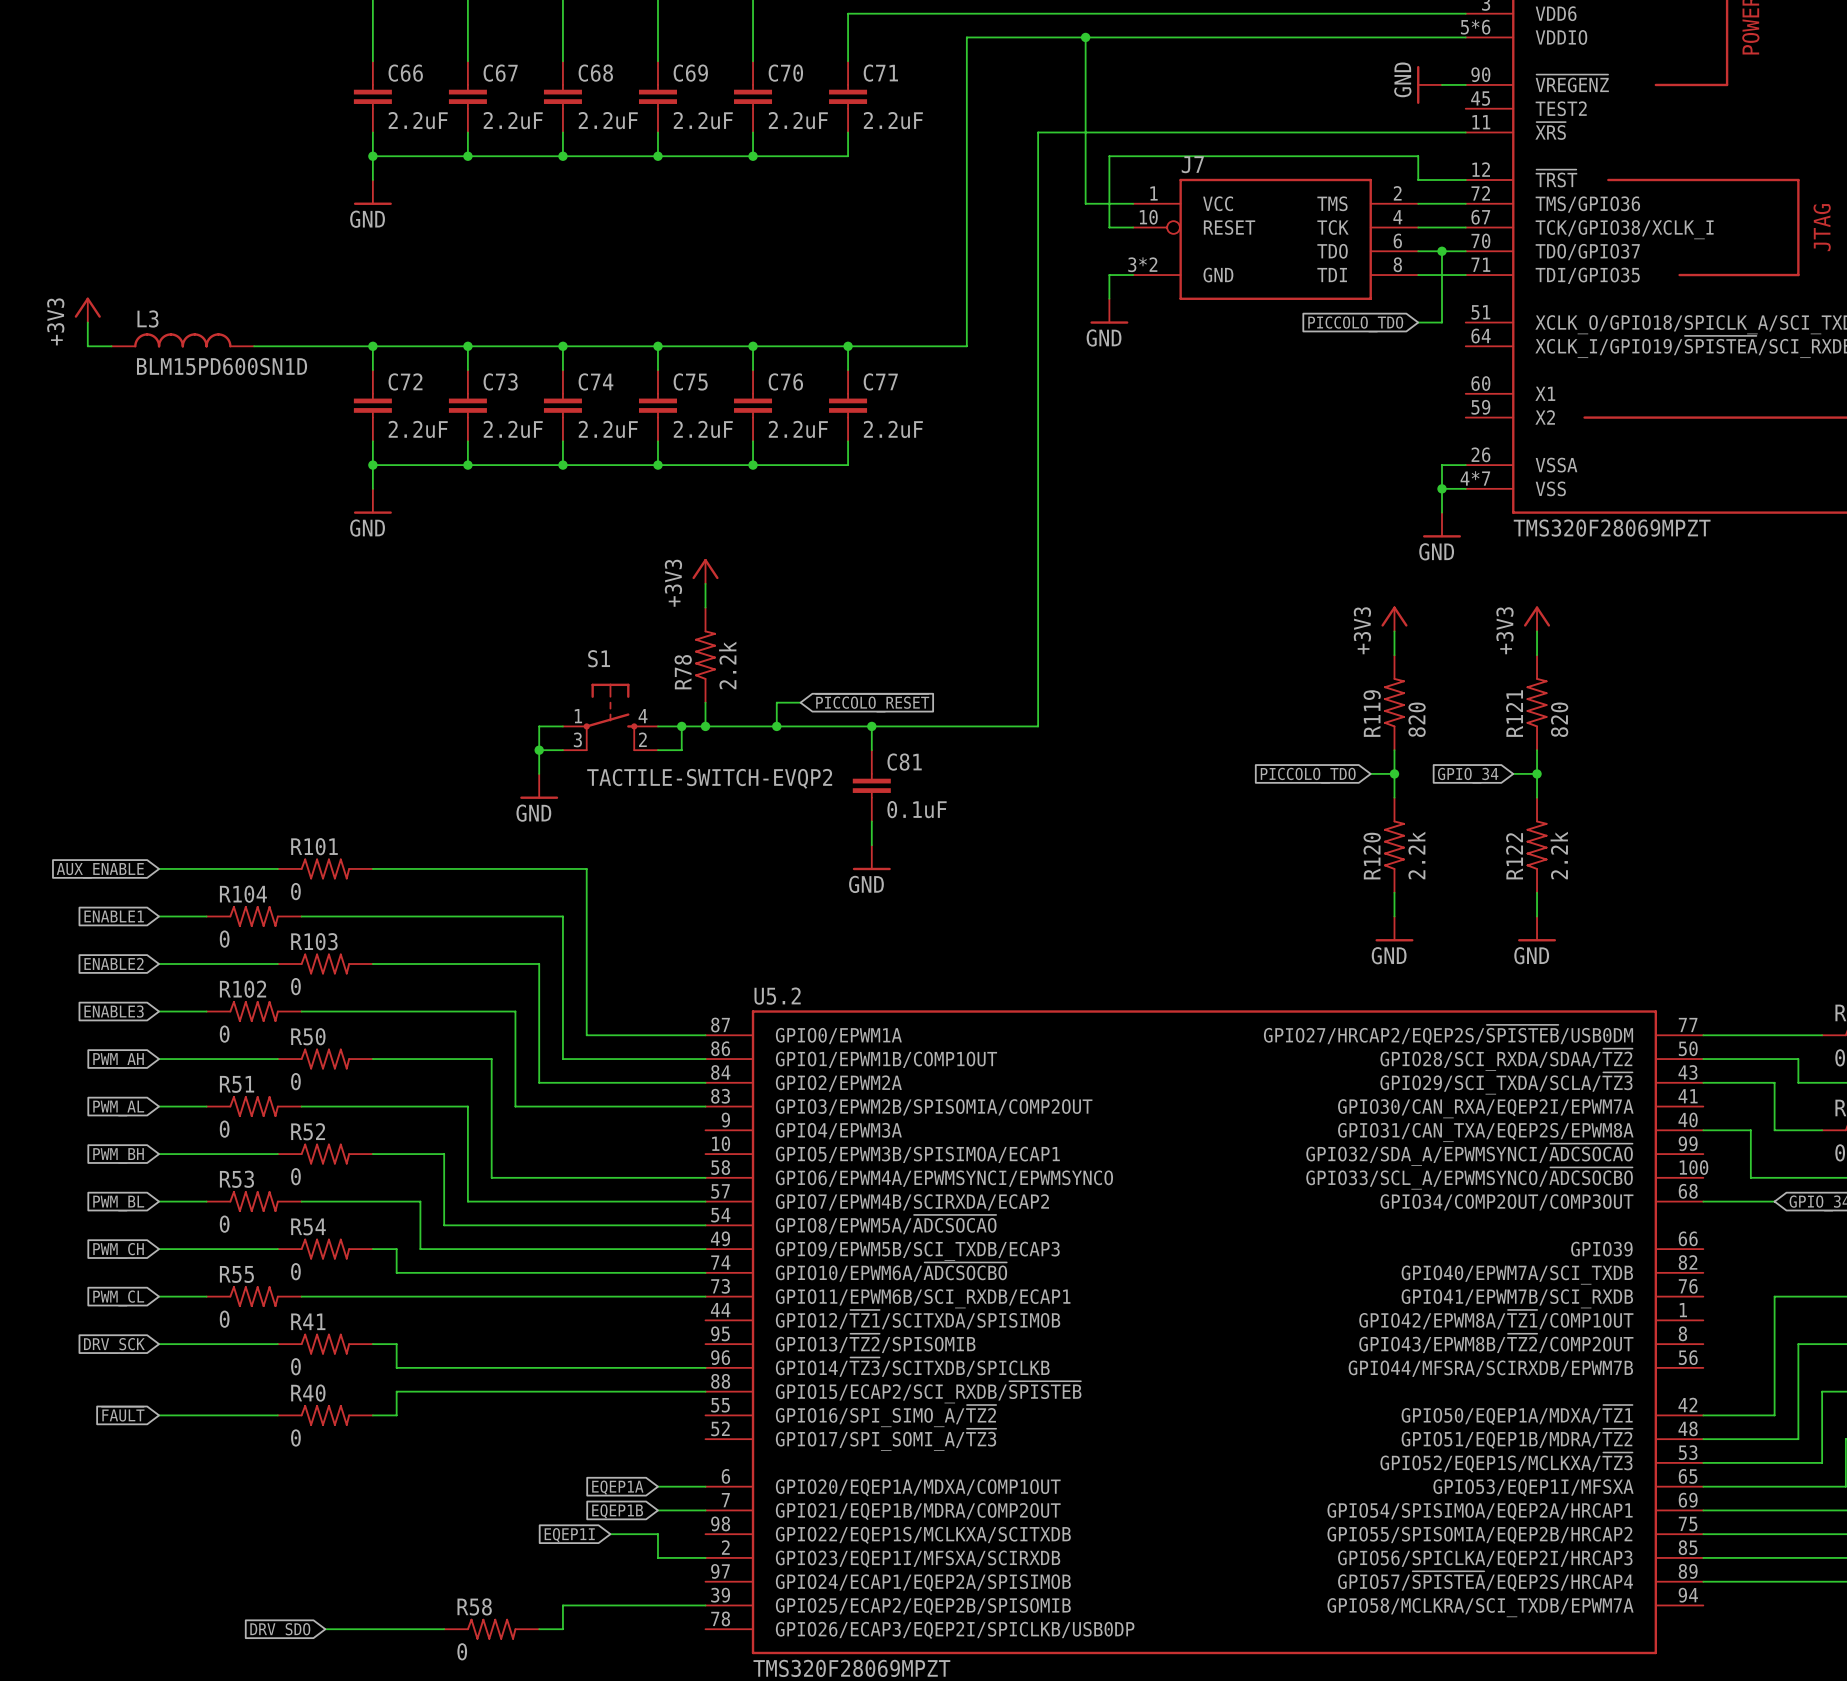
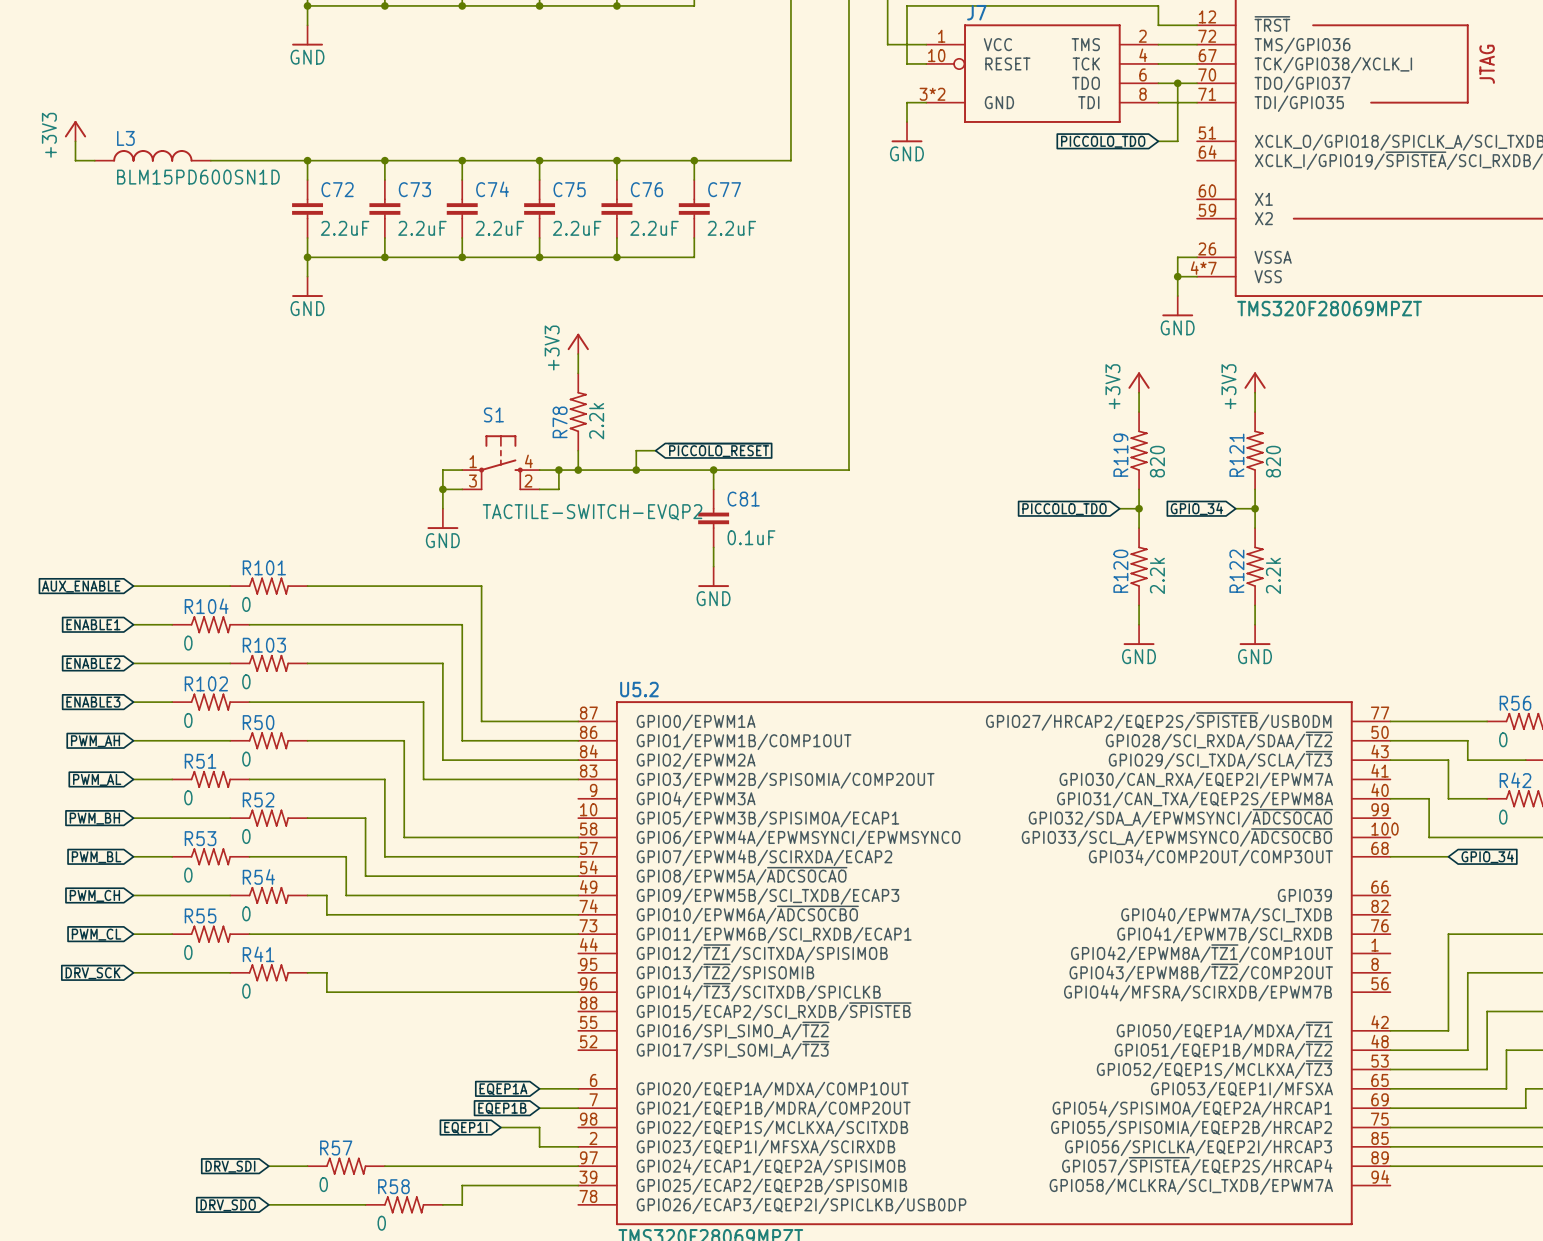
wire: (705, 1391) (396, 1391) (396, 1415) (372, 1415) -> none
global label: ~{FAULT} (123, 1414) -> none
wire: (159, 1415) (277, 1415) -> none
R40: 0 (325, 1415) -> none
wire: none -> (268, 1166) (307, 1166)
R57: none -> 0 (346, 1166)
wire: none -> (384, 1166) (578, 1166)
global label: none -> DRV_SDI (230, 1166)

